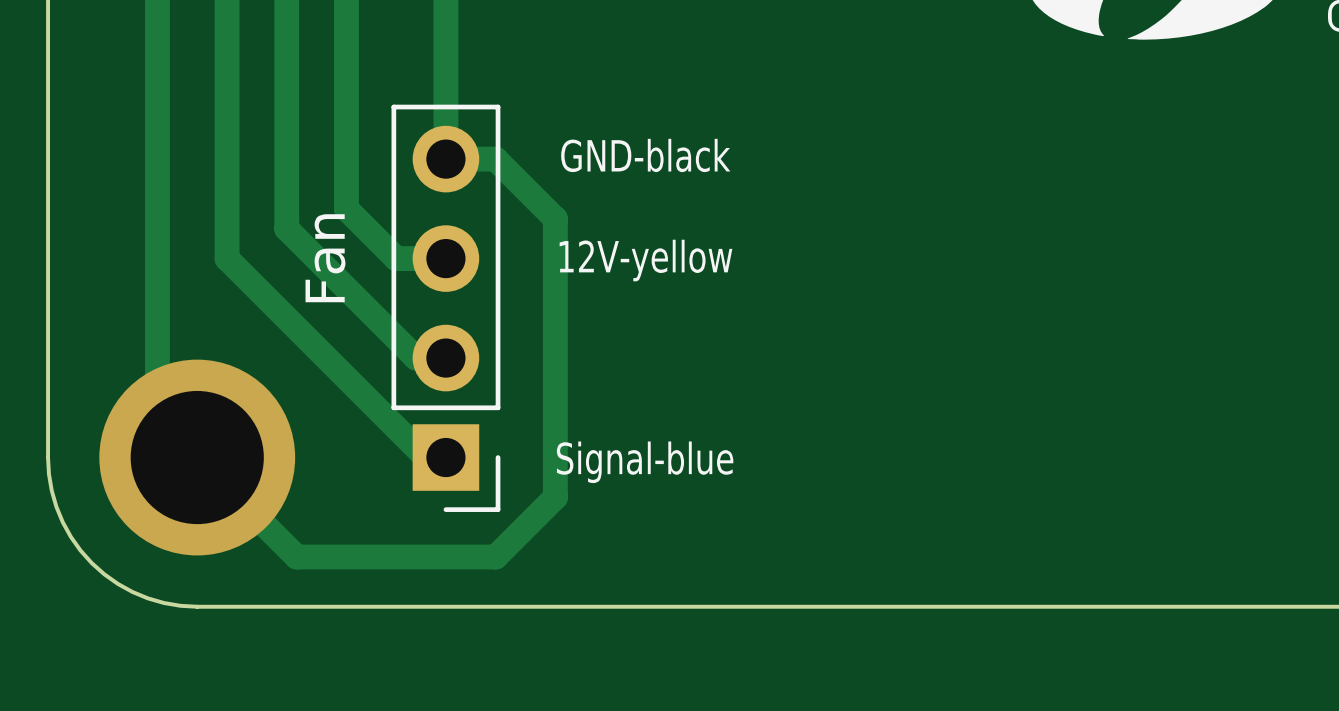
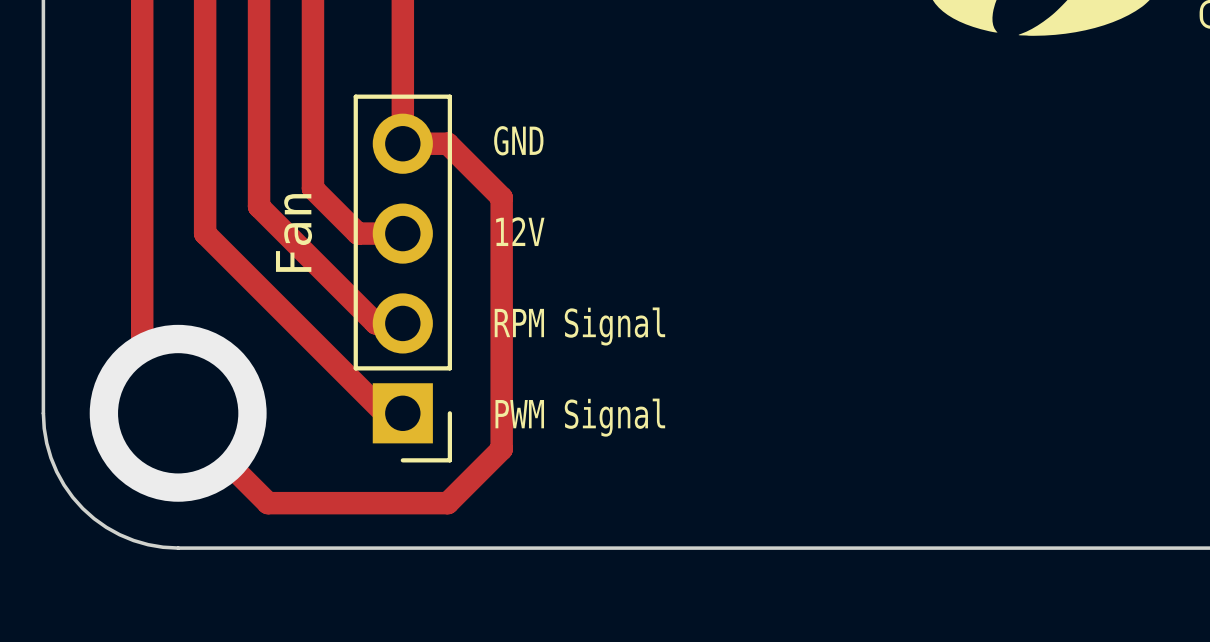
text: none -> GND (518, 140)
text: GND-black (645, 155) -> none
text: none -> 12V (520, 231)
text: 12V-yellow (645, 260) -> none
text: none -> RPM Signal (579, 326)
text: none -> PWM Signal (580, 417)
text: Signal-blue (645, 462) -> none

